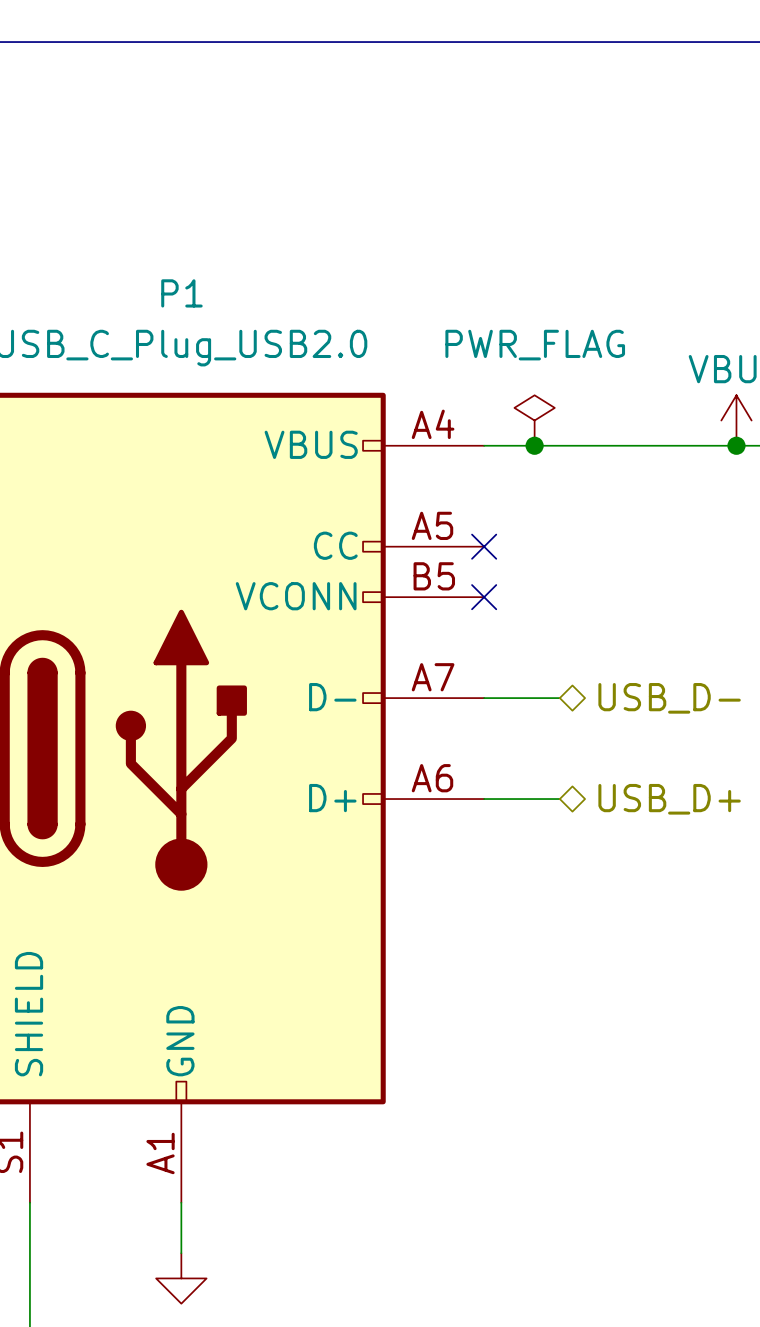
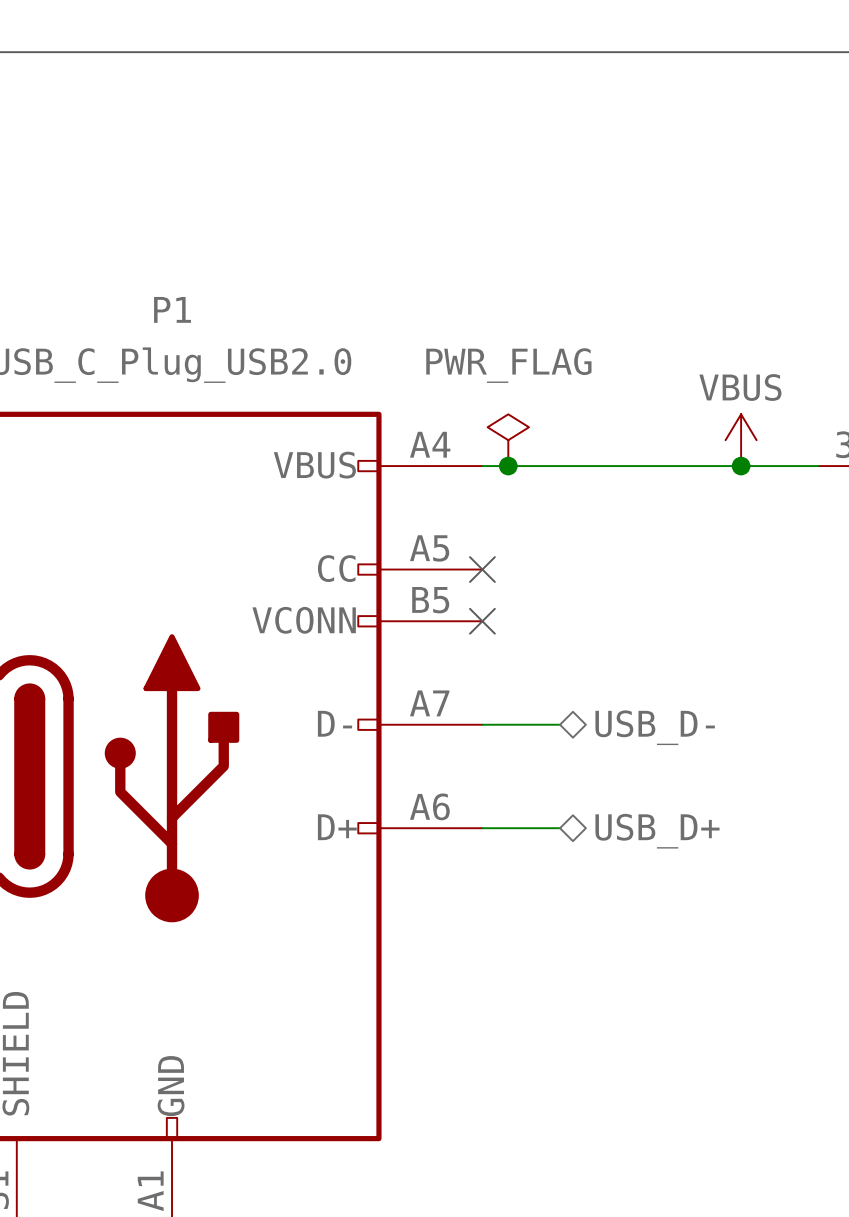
power symbol position: PWR_FLAG (534, 420) -> PWR_FLAG (508, 440)
junction position: (534, 445) -> (508, 466)

